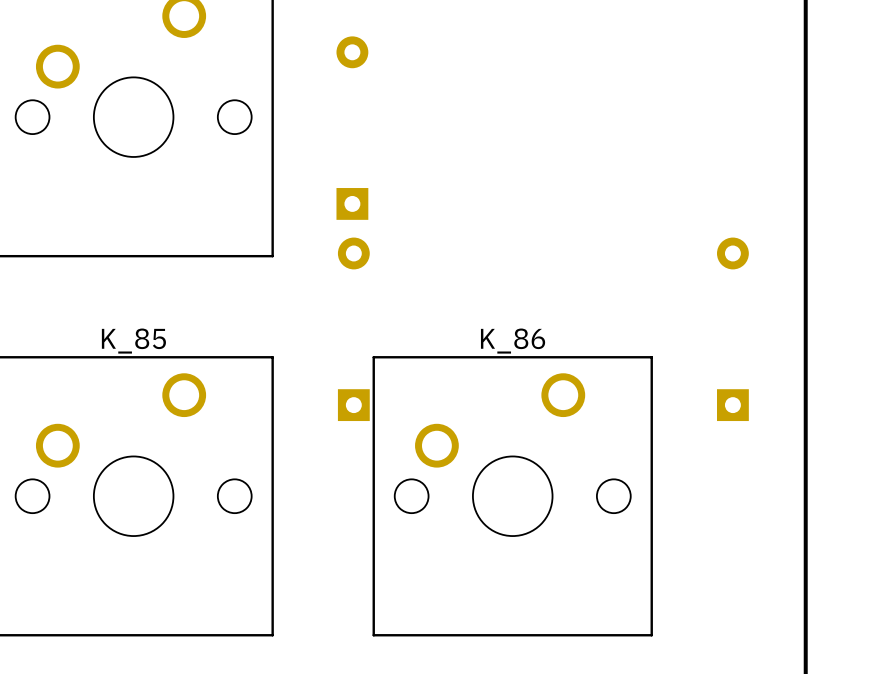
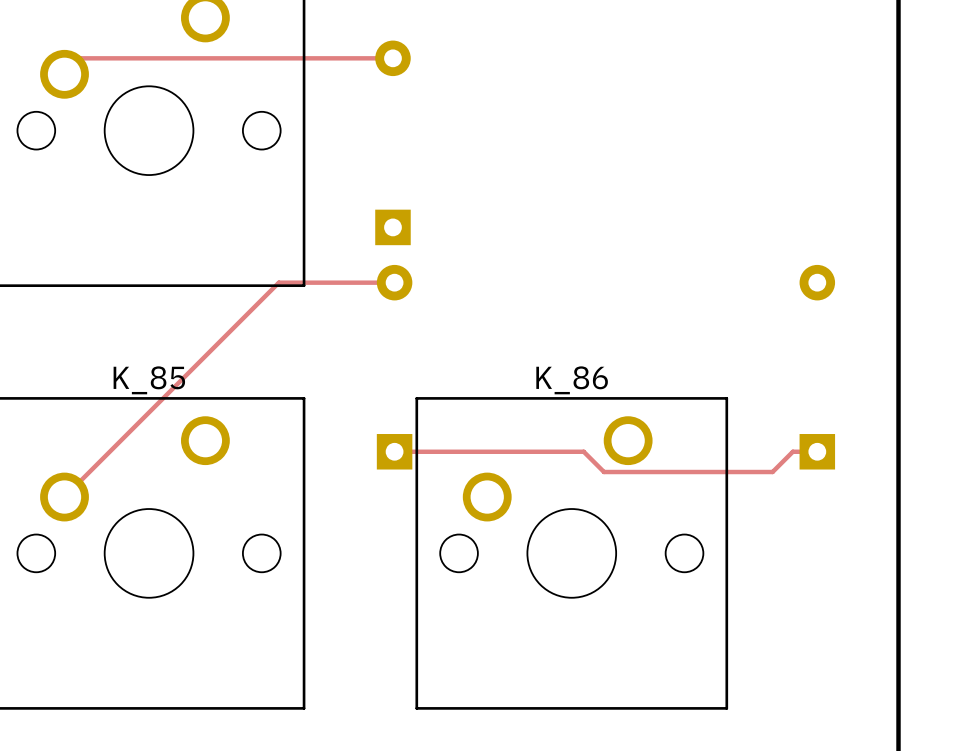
track: none -> (392, 58) (80, 58) (64, 74)
track: none -> (394, 282) (278, 282) (64, 497)
track: none -> (394, 451) (583, 451) (604, 472) (772, 472) (792, 451) (817, 451)

